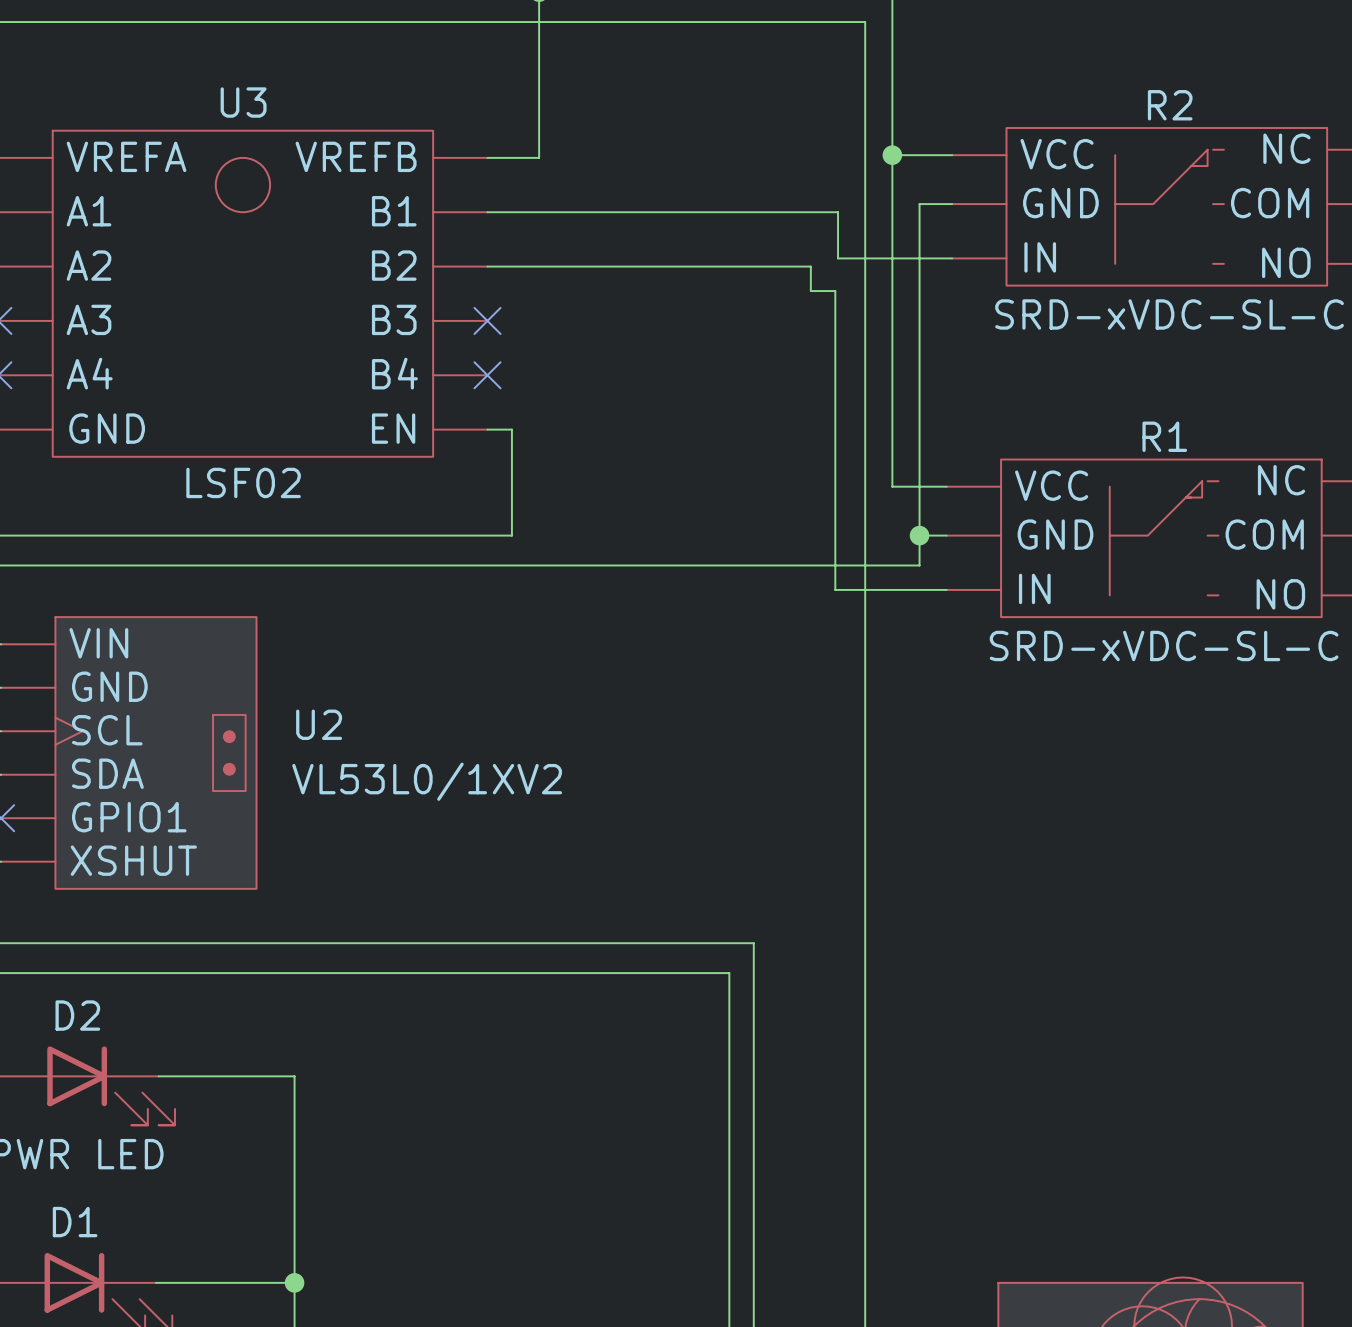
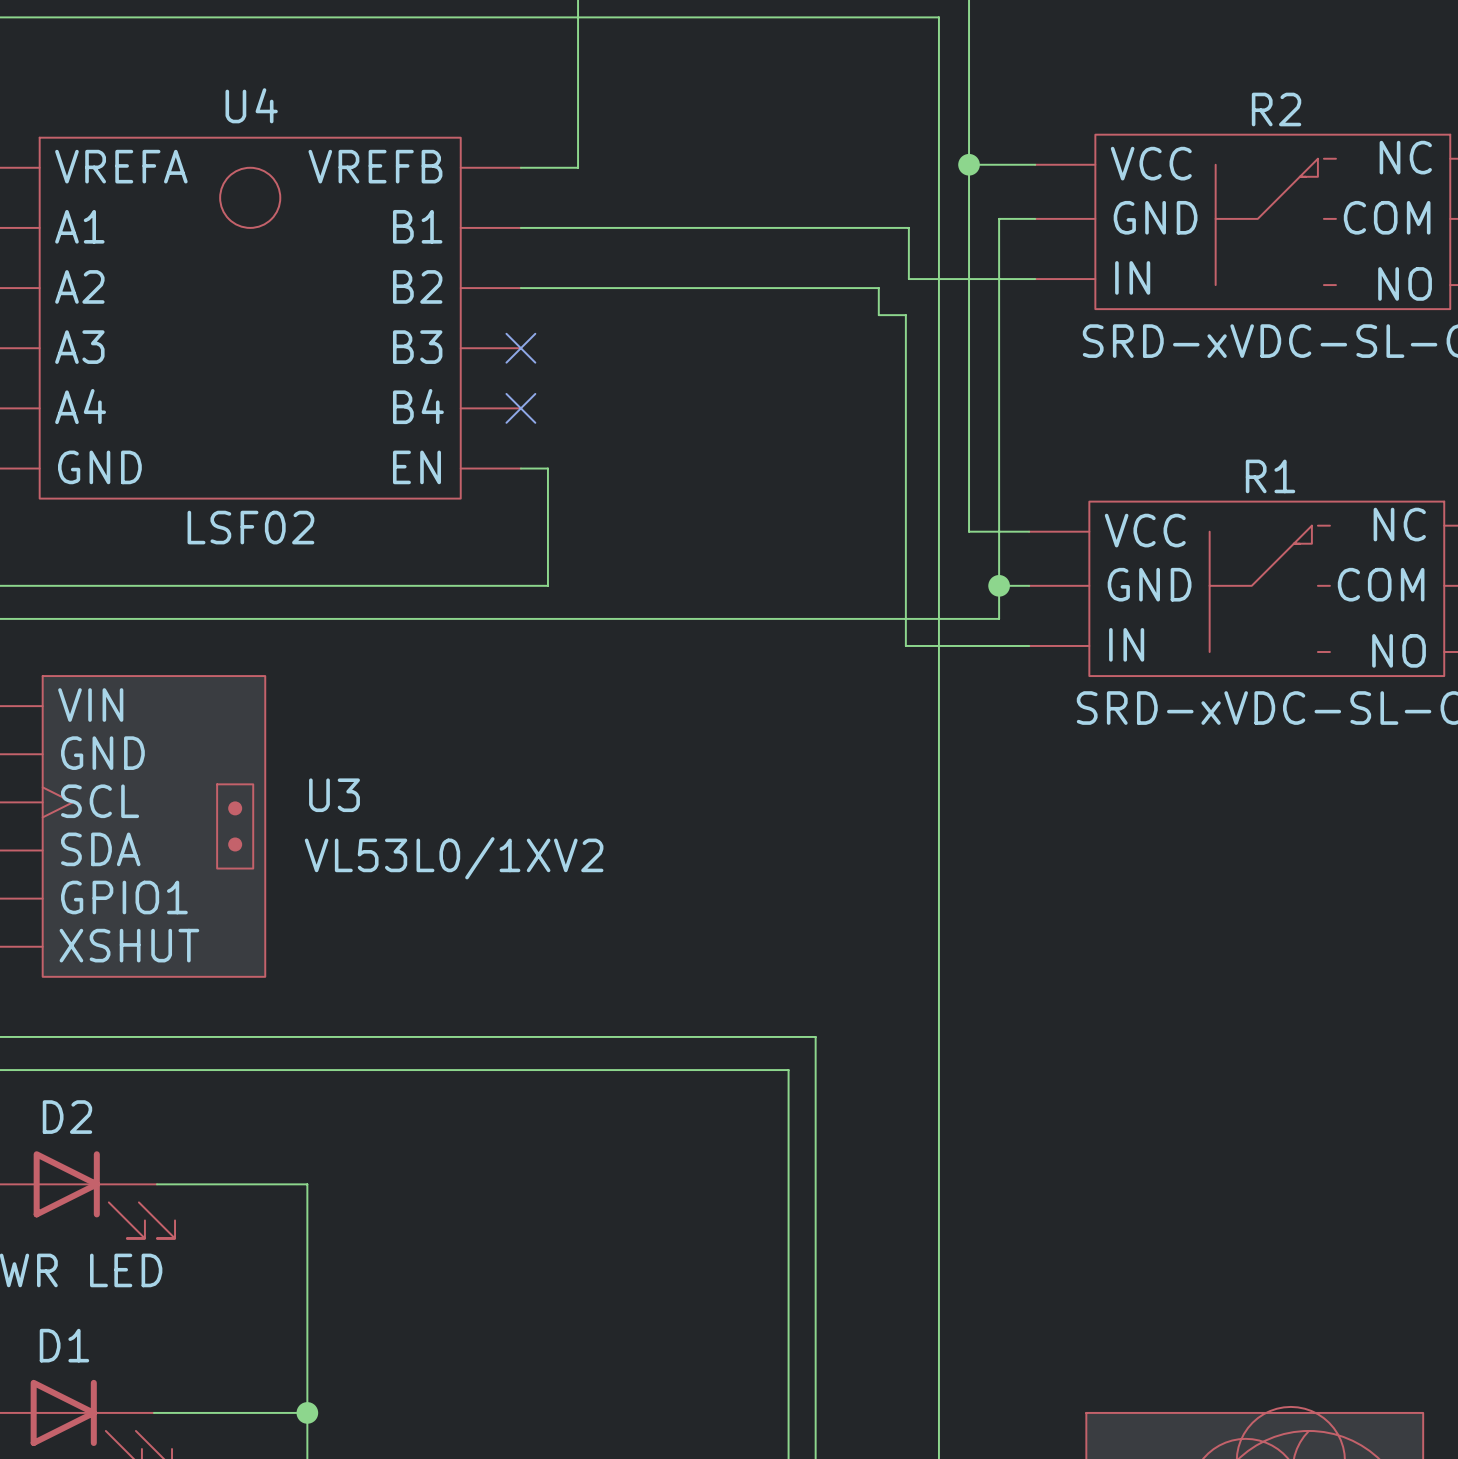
U3 name: U3 (243, 102) -> U4 (251, 105)
U2 name: U2 (319, 724) -> U3 (334, 795)

